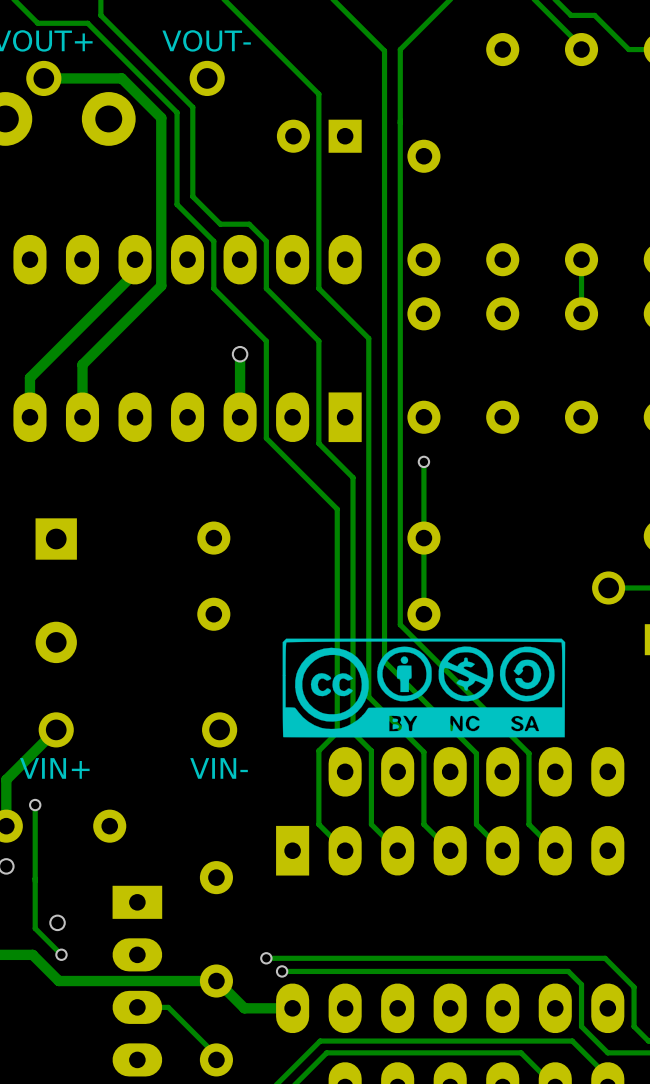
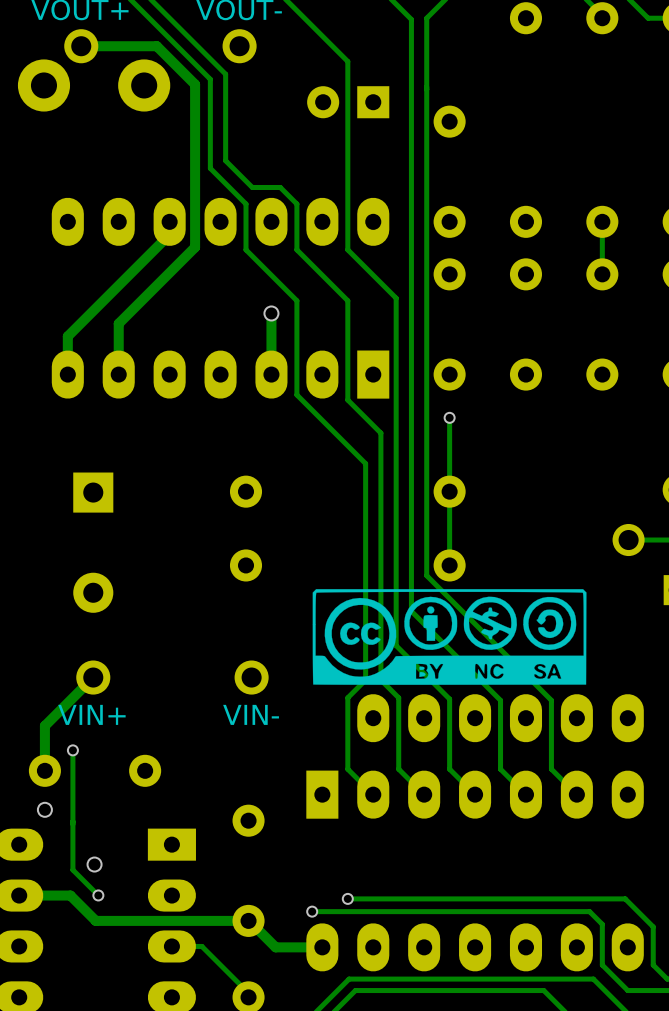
via position: (266, 958) -> (347, 898)
track: (318, 958) (266, 958) -> none

